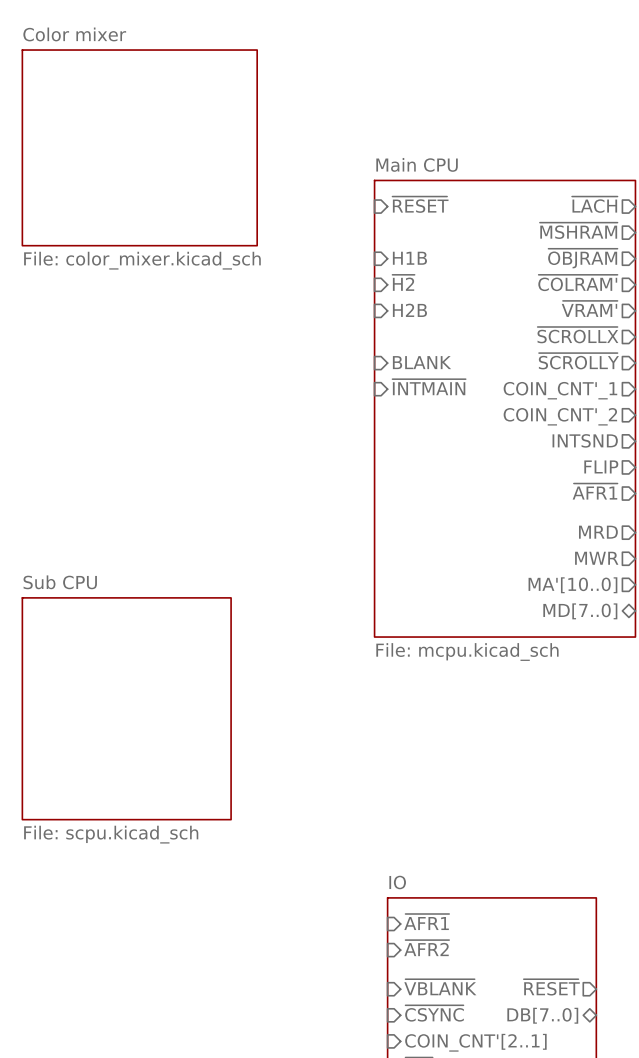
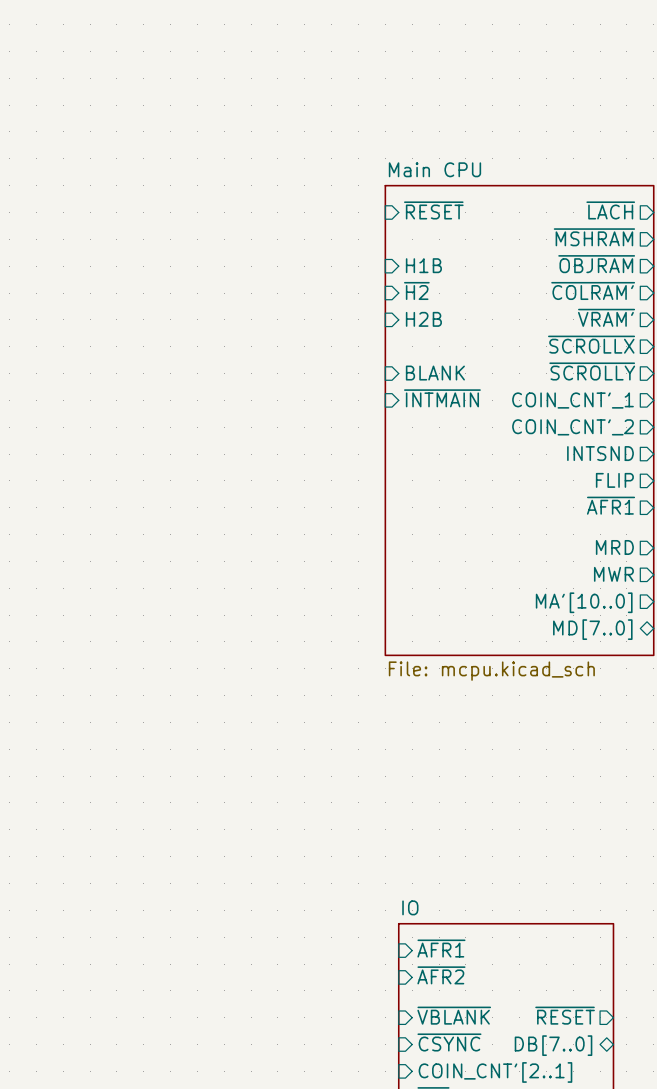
sheet Color mixer: File: color_mixer.kicad_sch (139, 147) -> none
sheet Sub CPU: File: scpu.kicad_sch (126, 708) -> none

